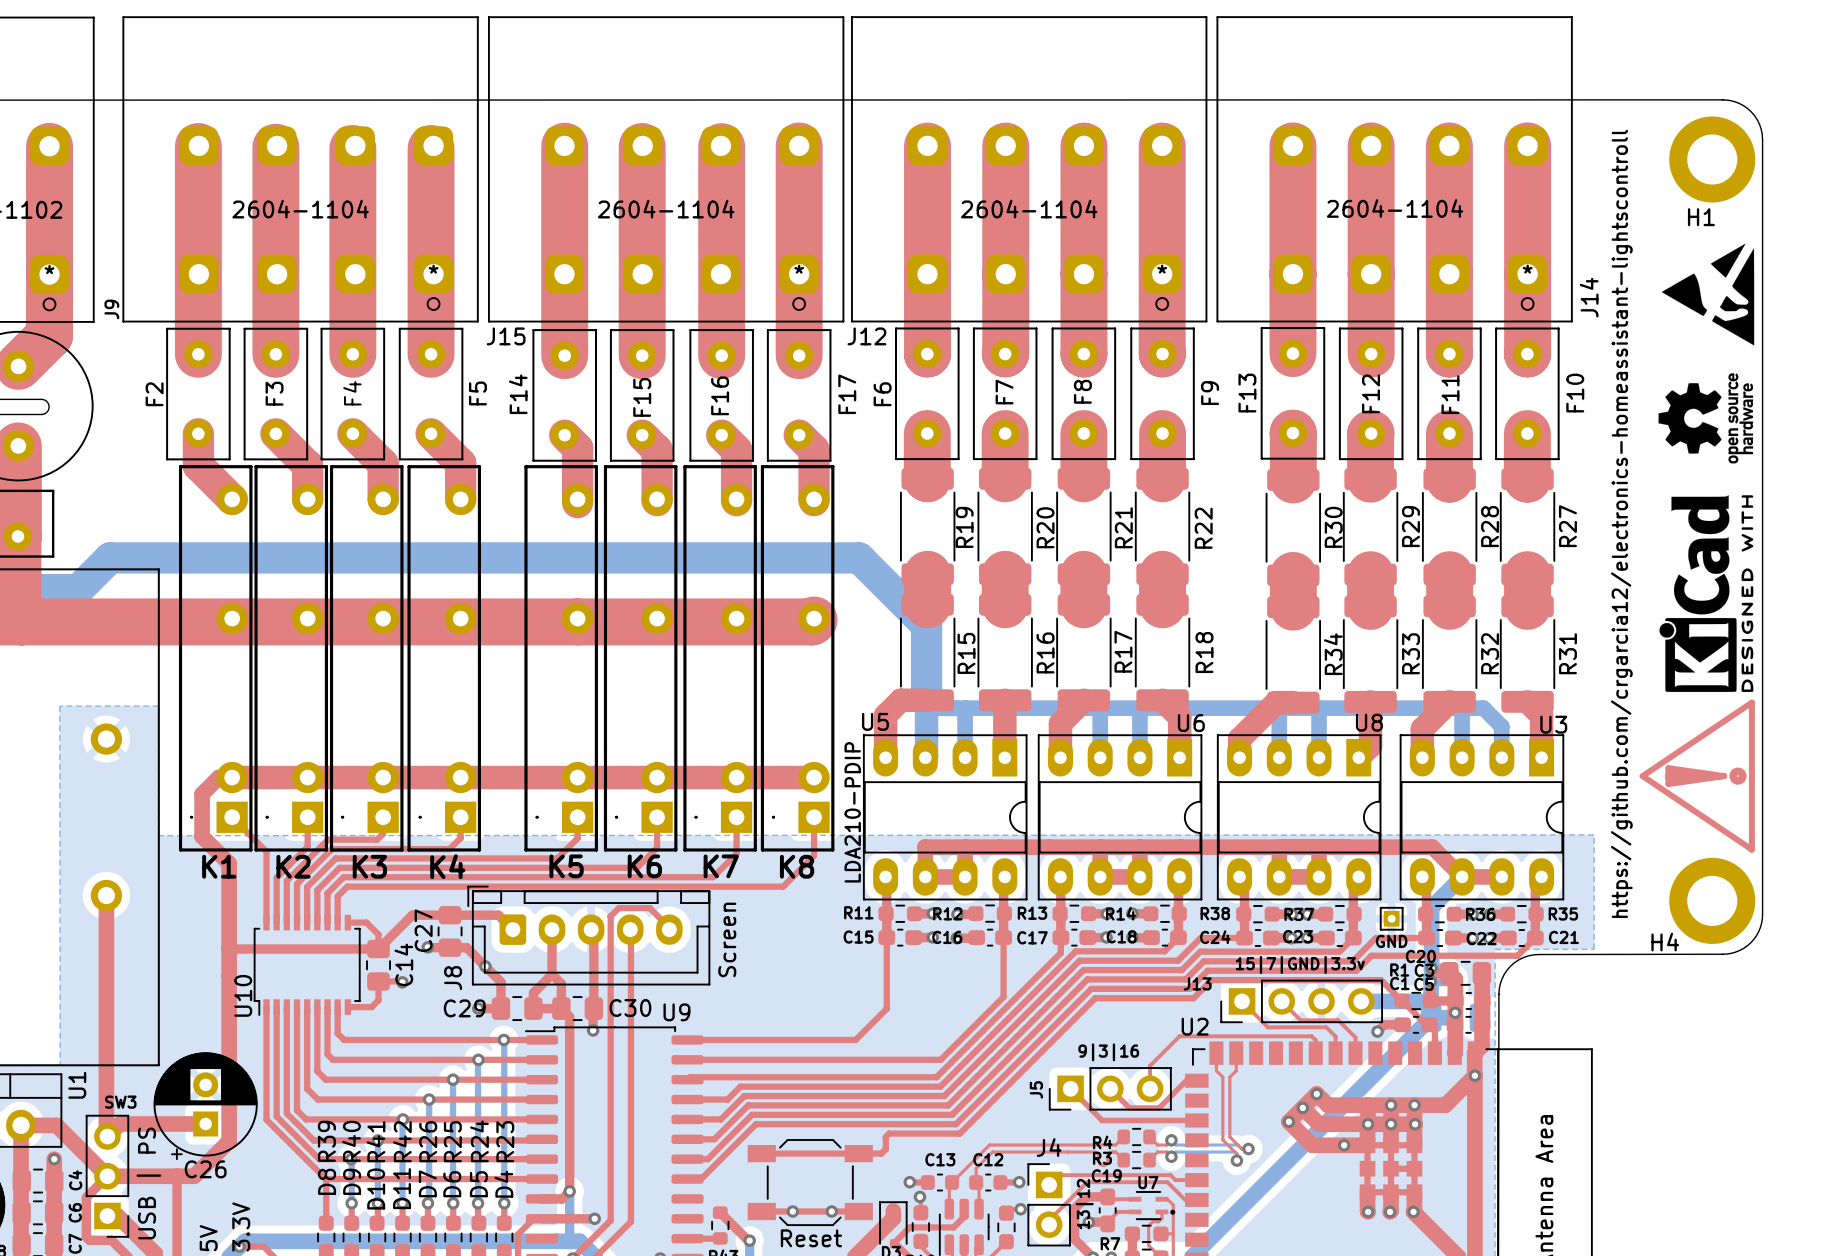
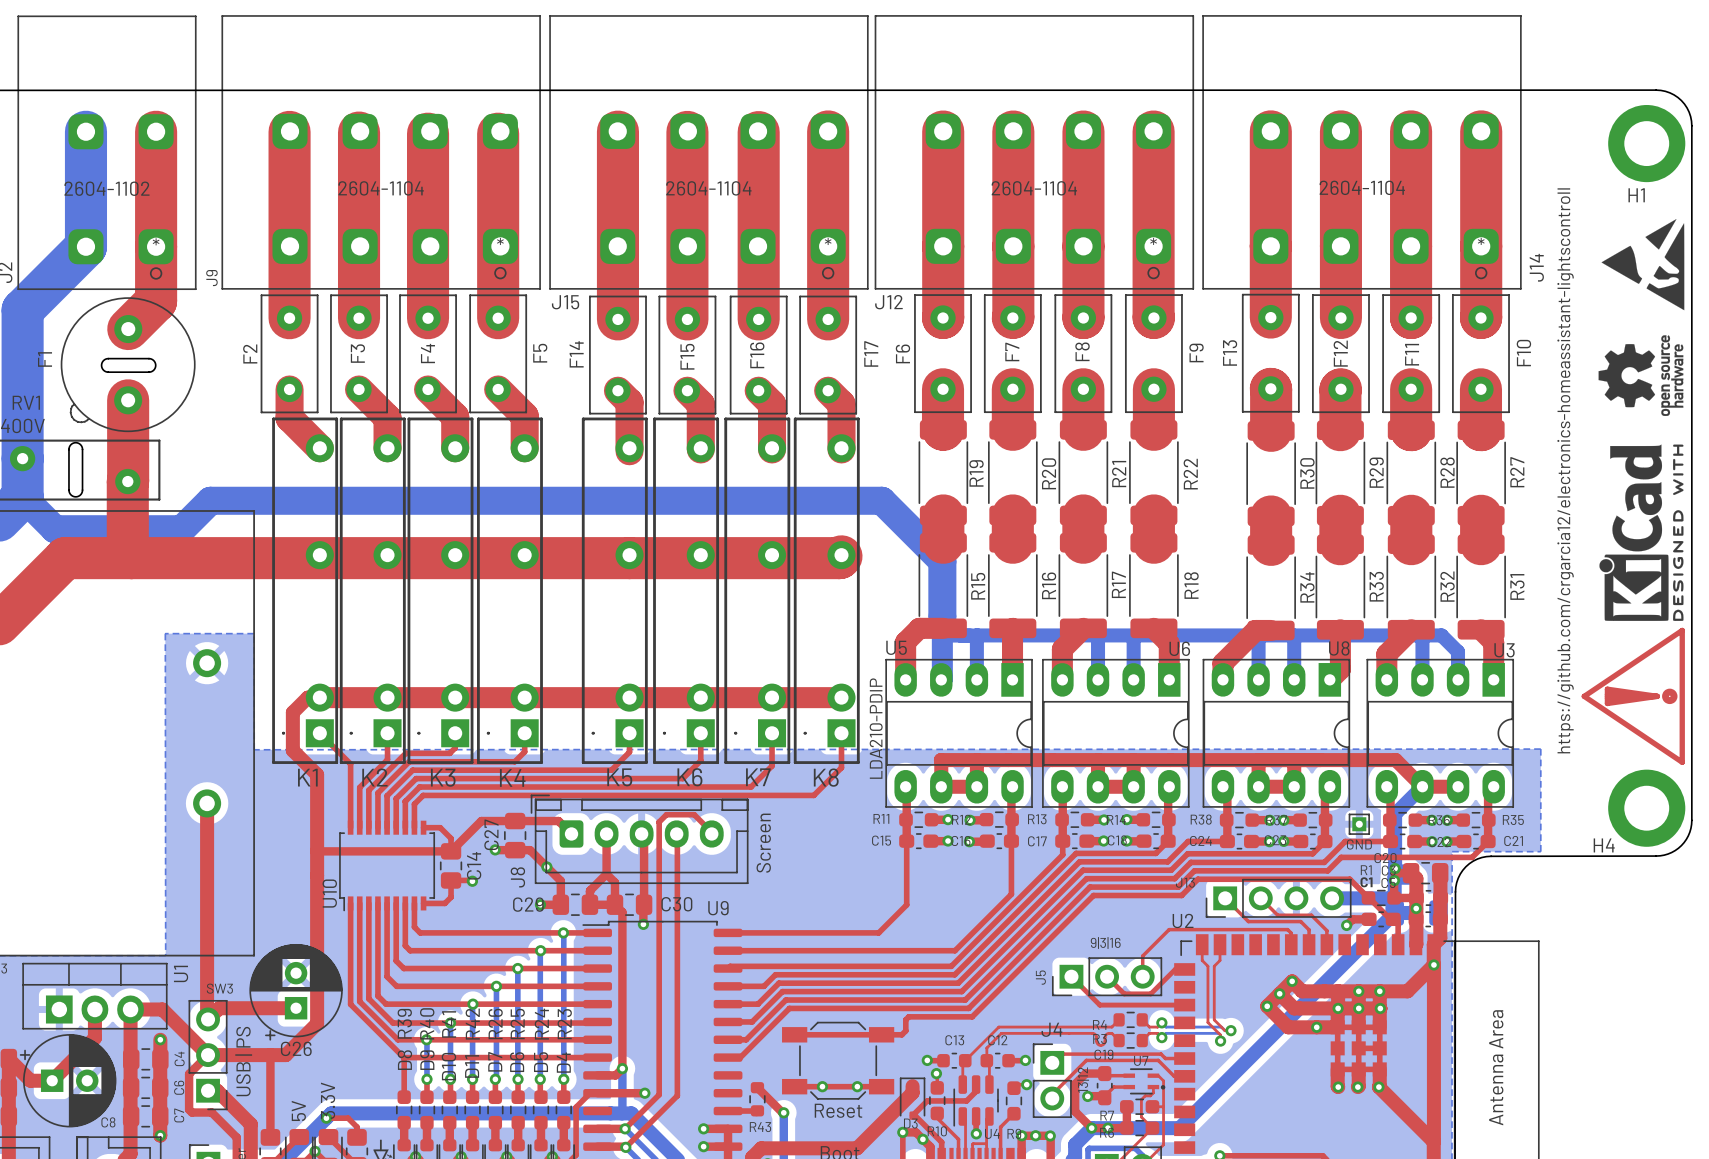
J13 value: 15|7|GND|3.3v (1300, 964) -> none

